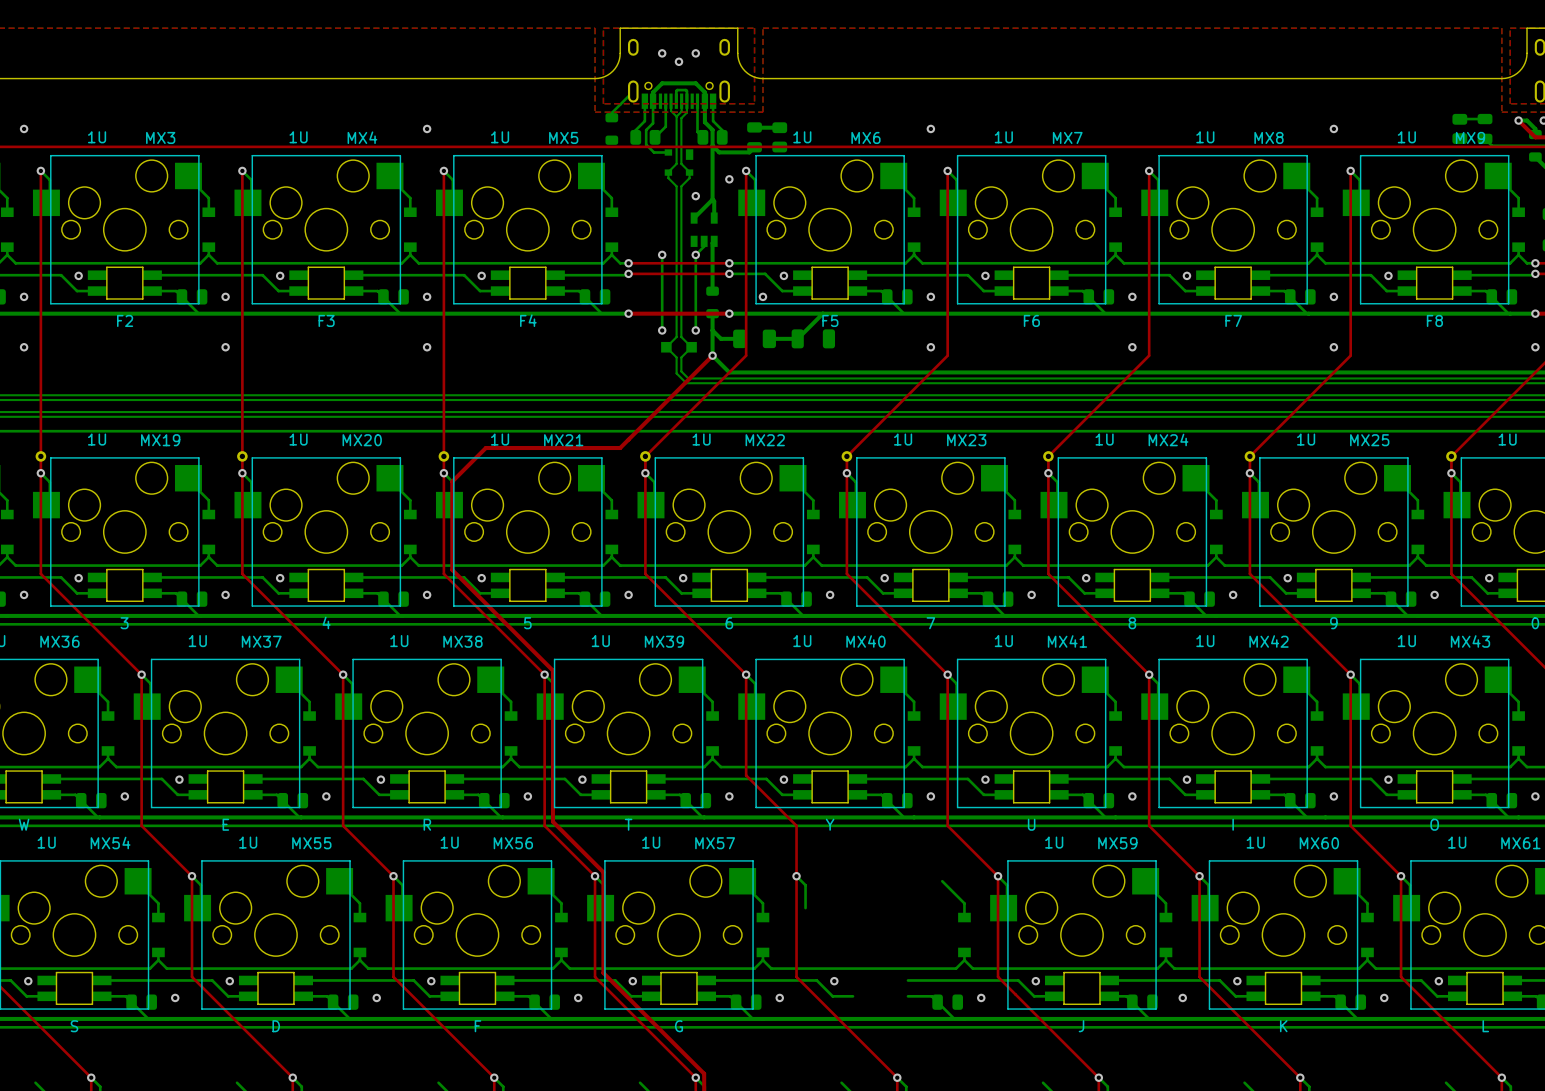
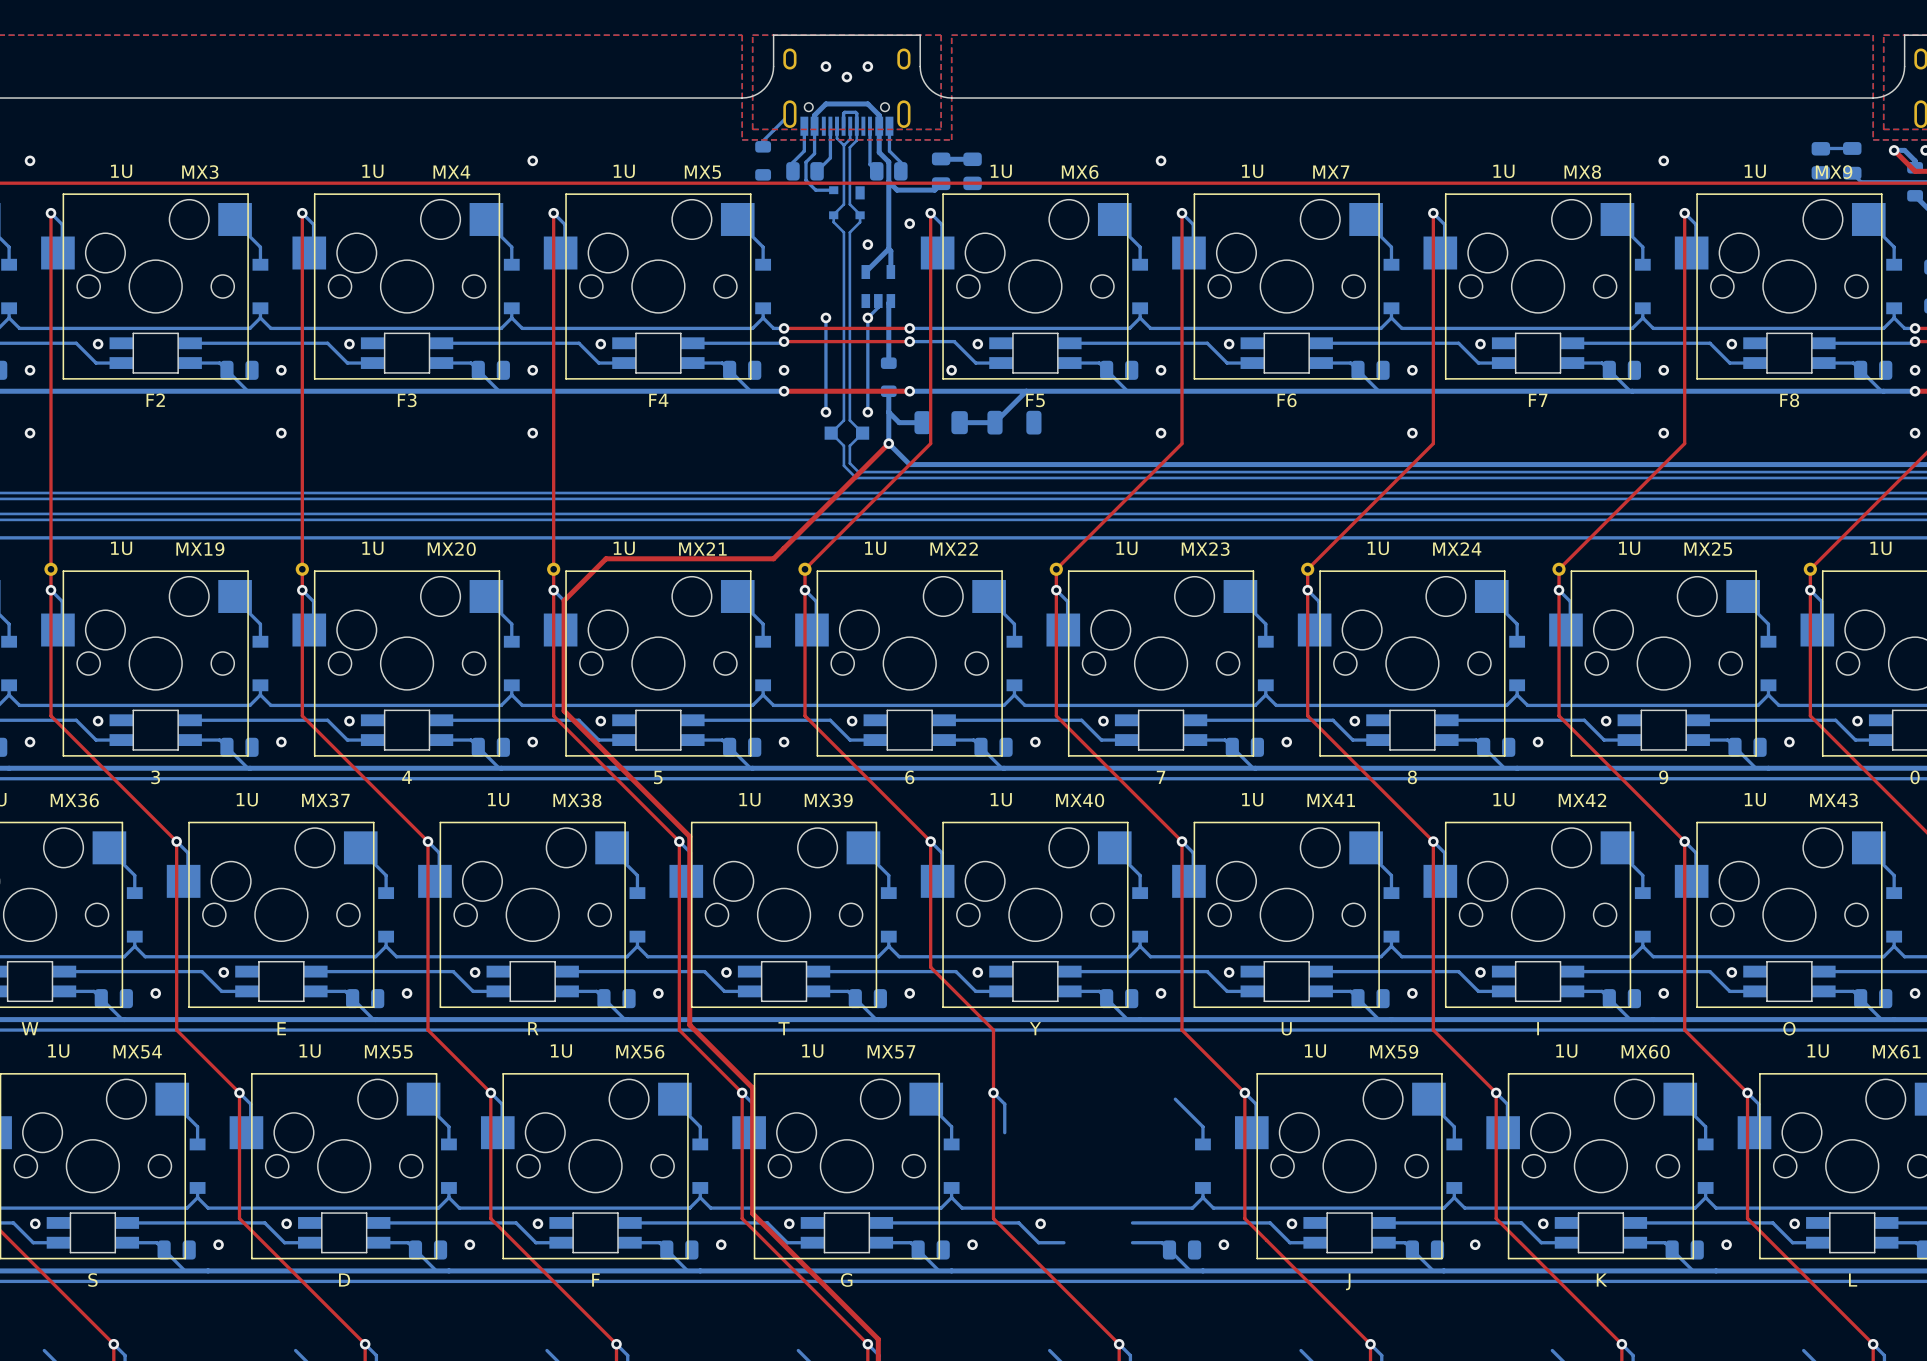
via: none -> (784, 370)
via: none -> (1915, 370)

